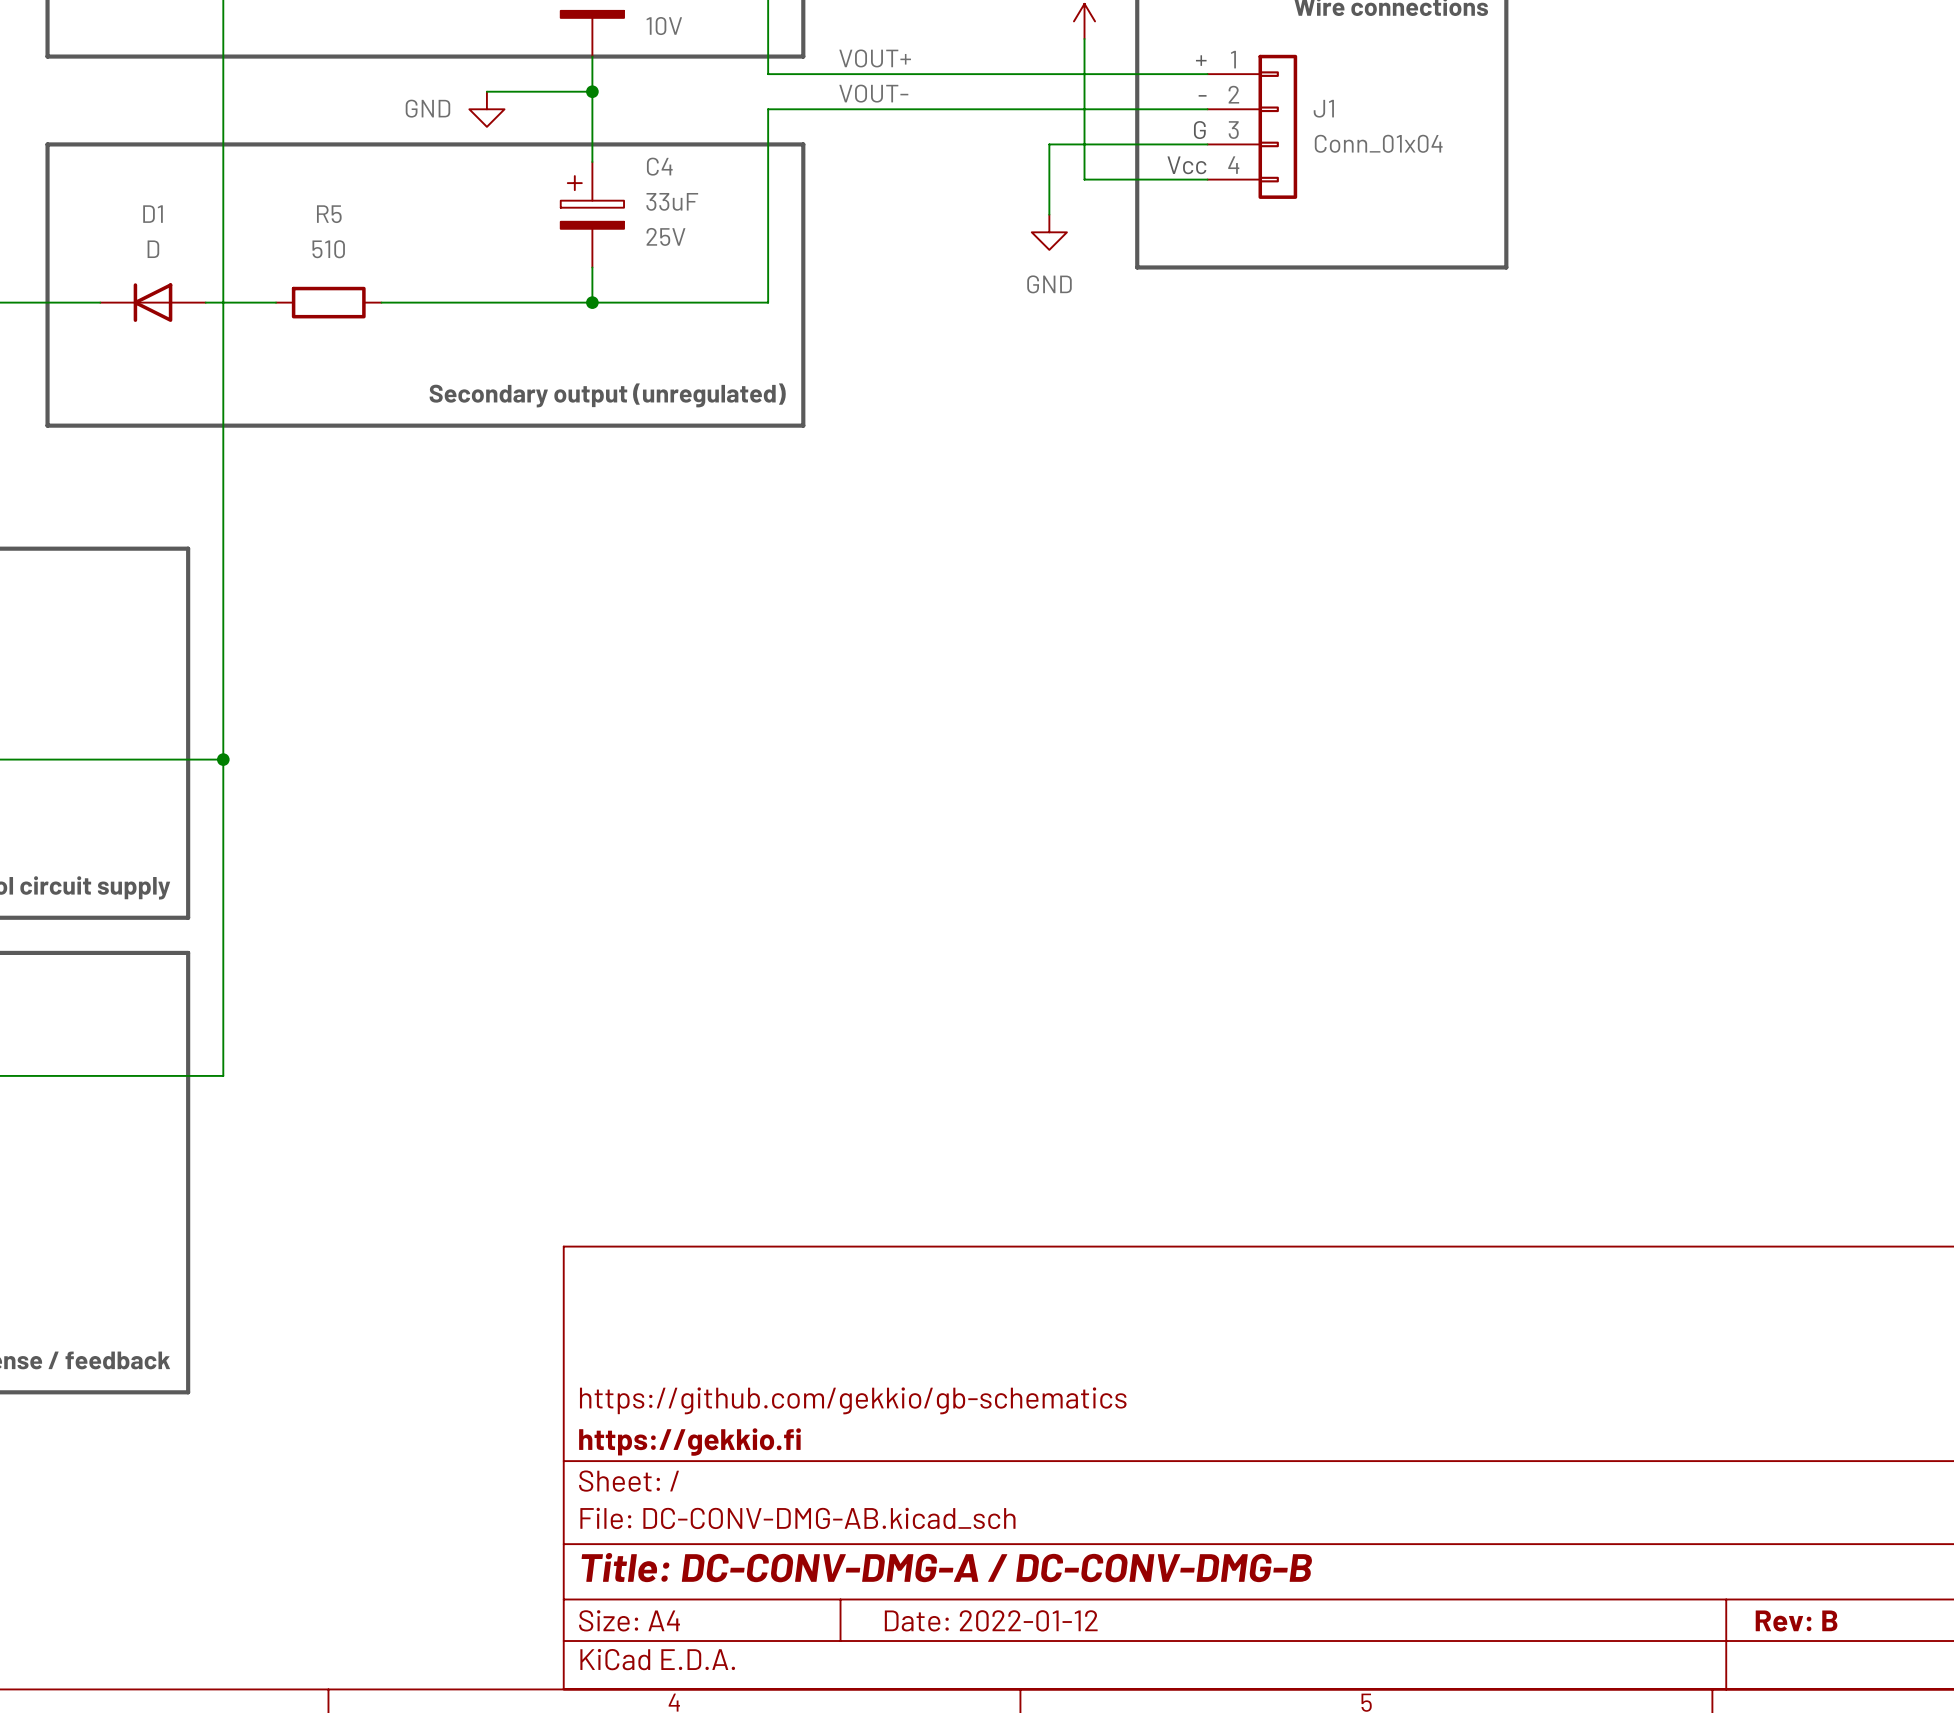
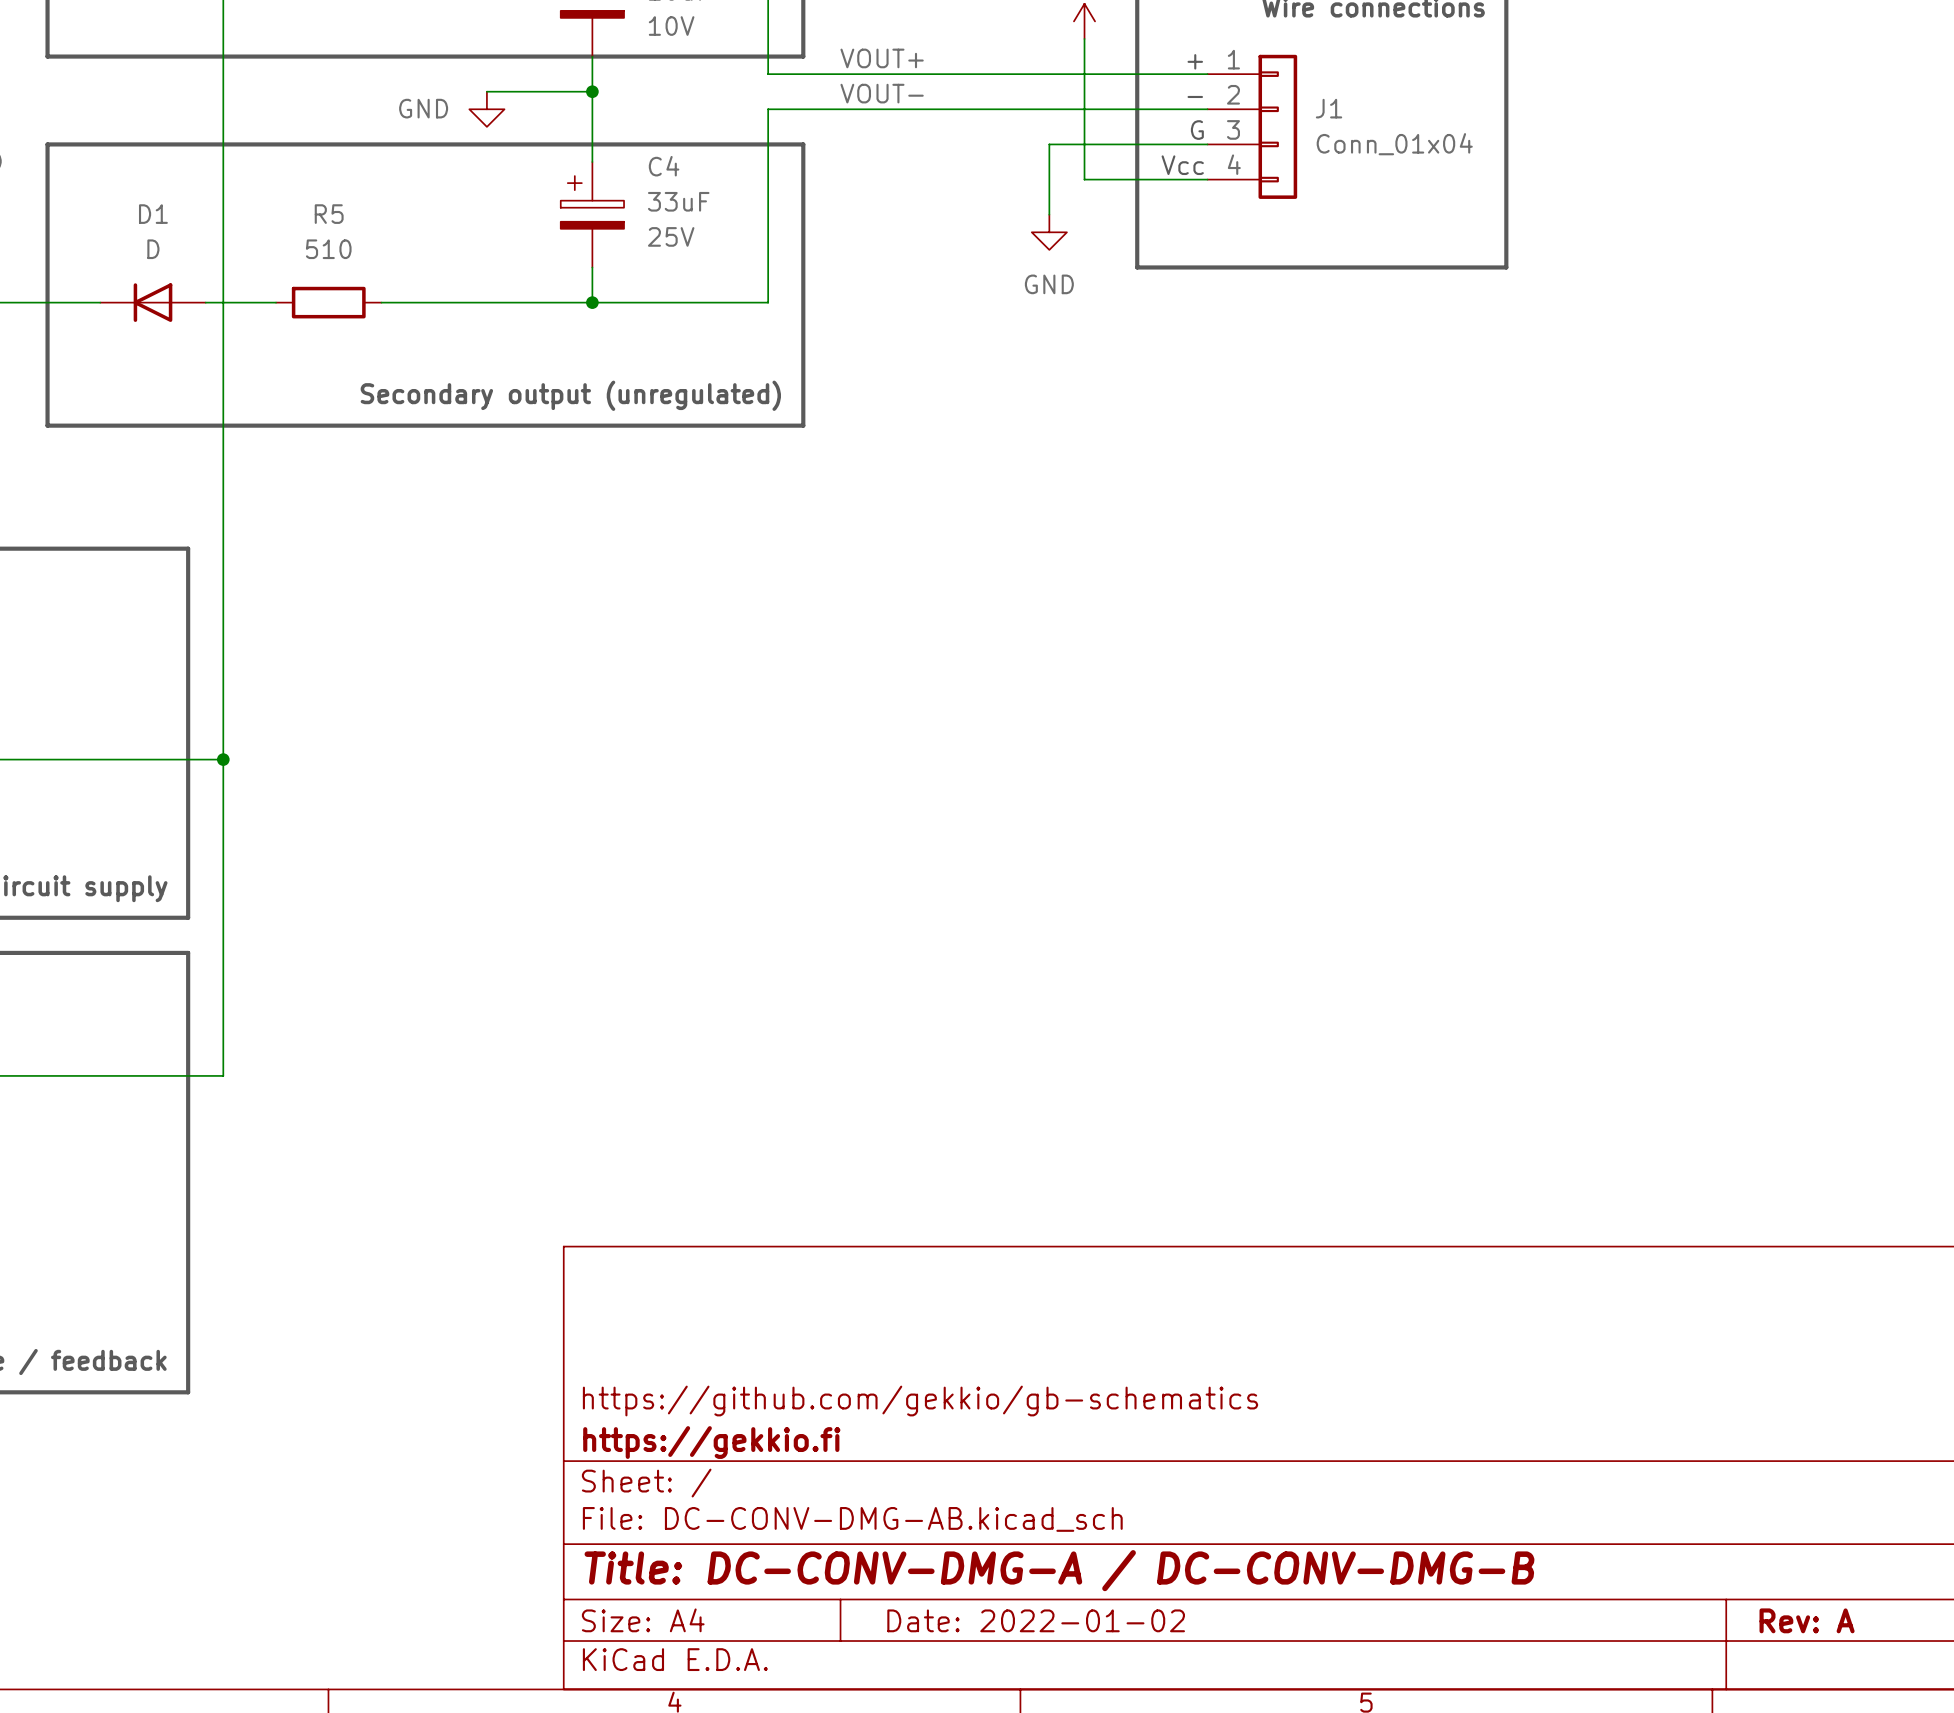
title block: Date: 2022-01-12 (991, 1620) -> Date: 2022-01-02 (1036, 1620)
title block: Rev: B (1796, 1620) -> Rev: A (1807, 1620)

